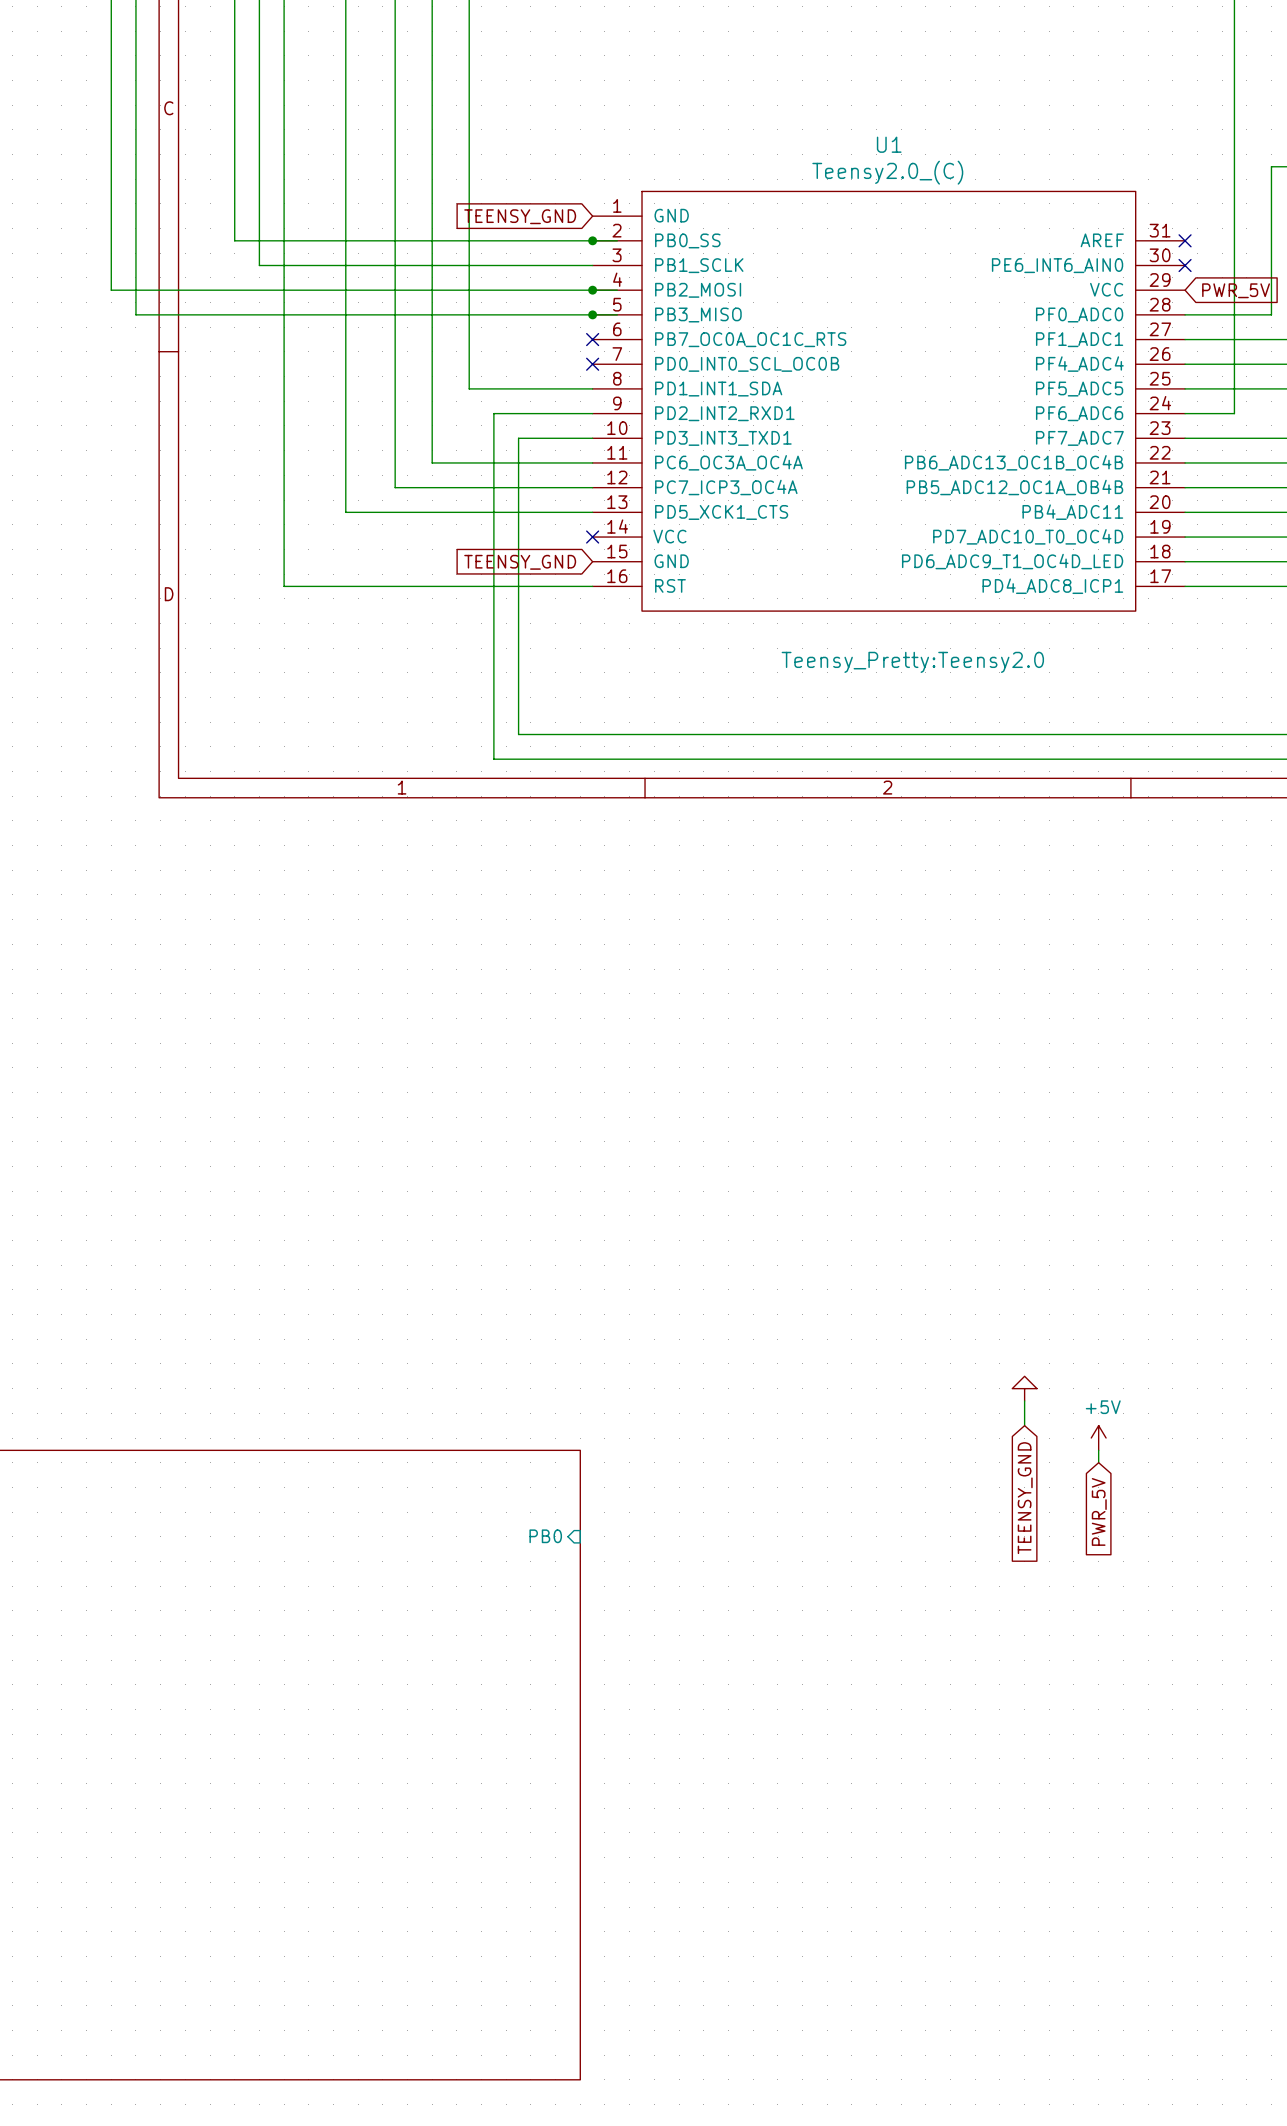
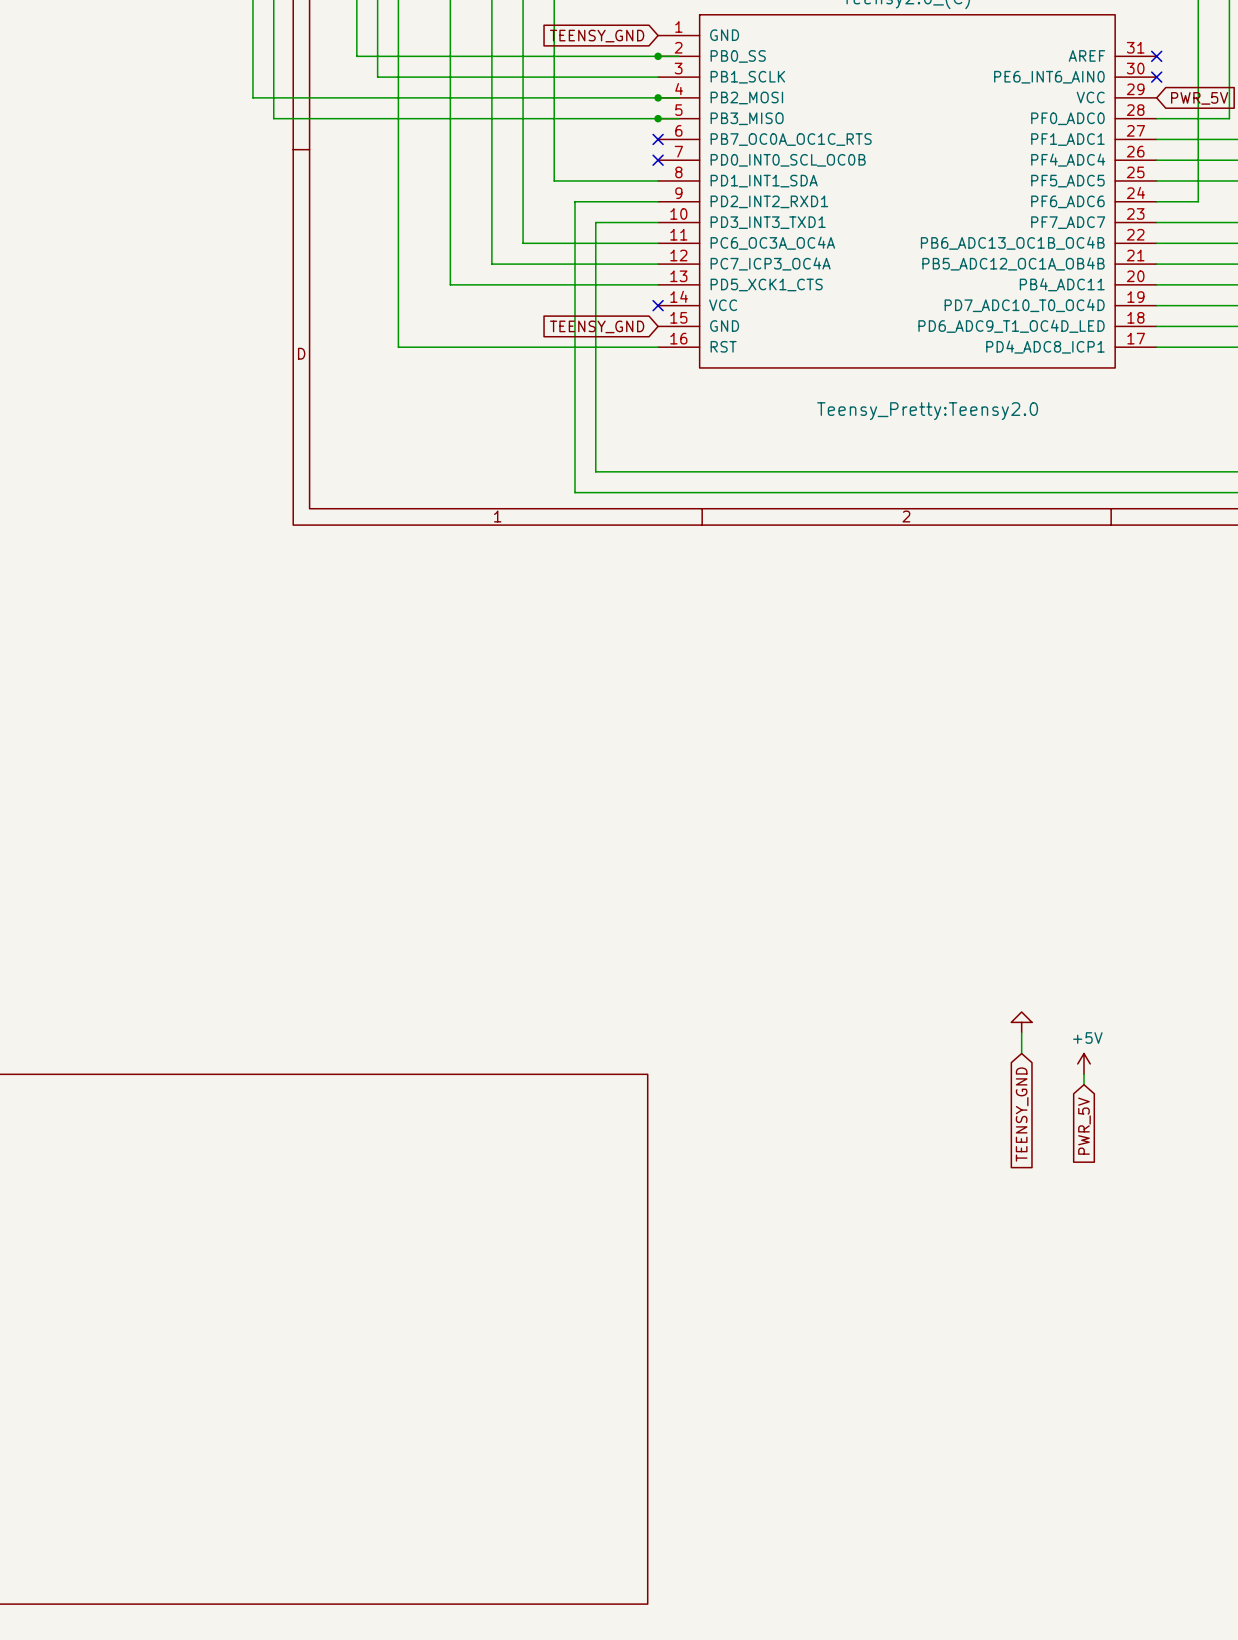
sheet pin: PB0 (545, 1536) -> none

